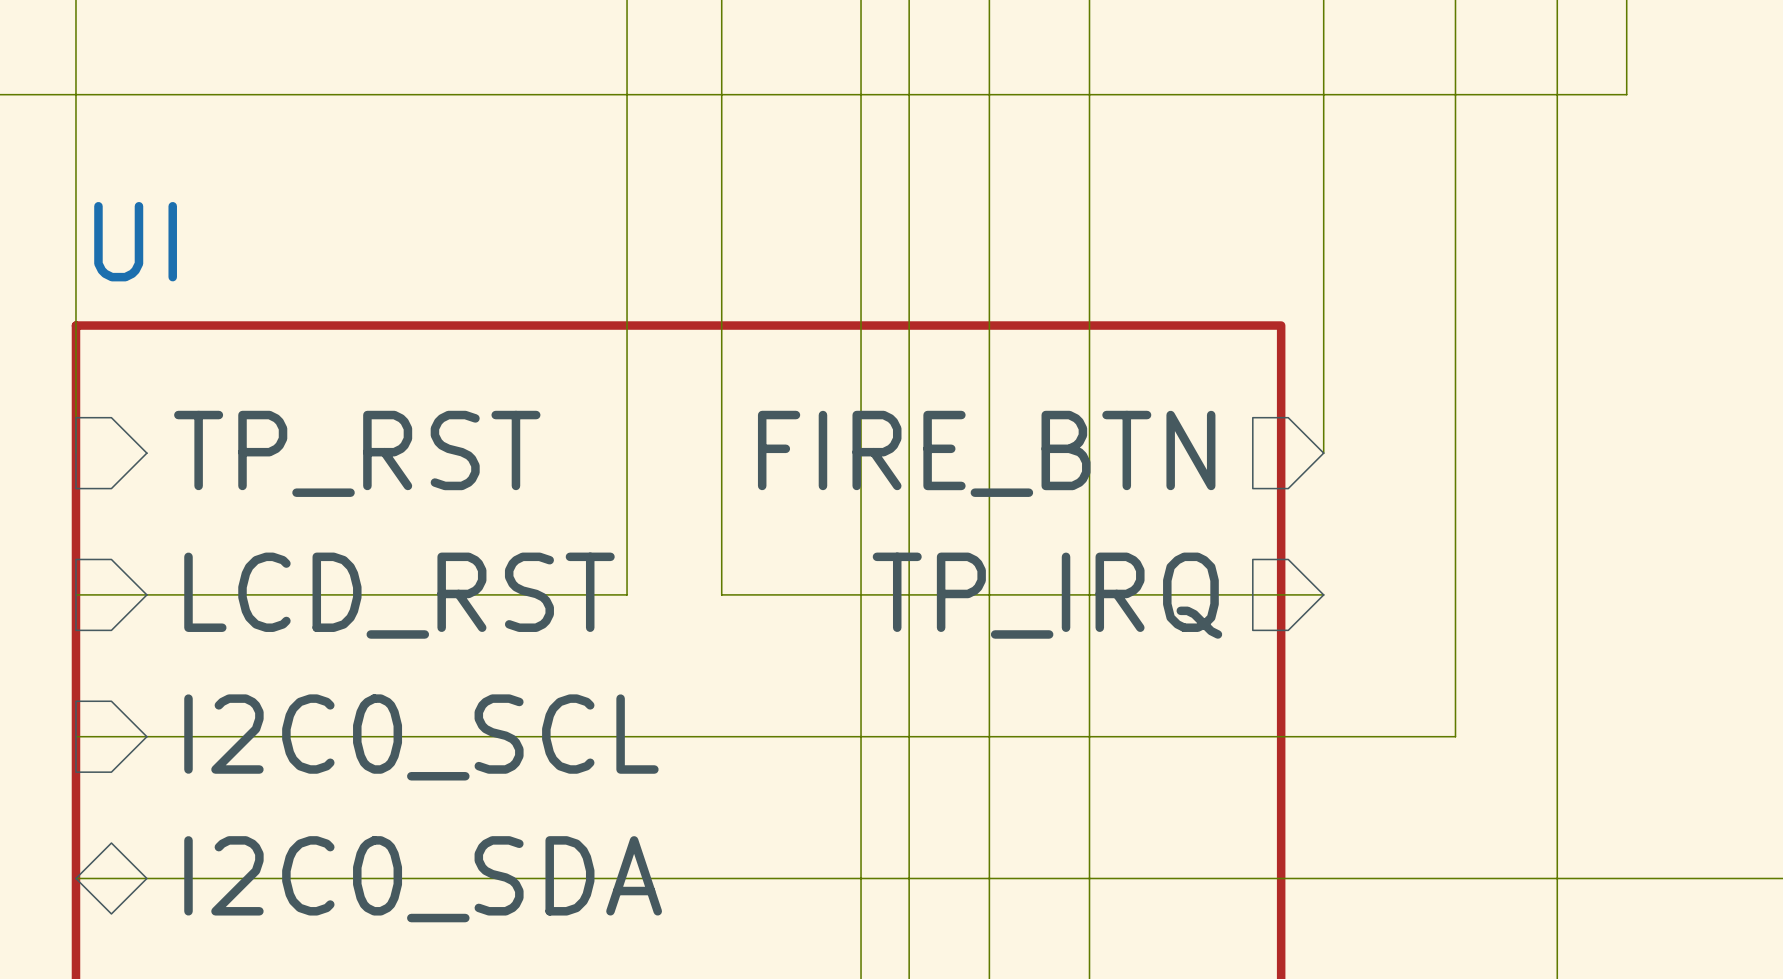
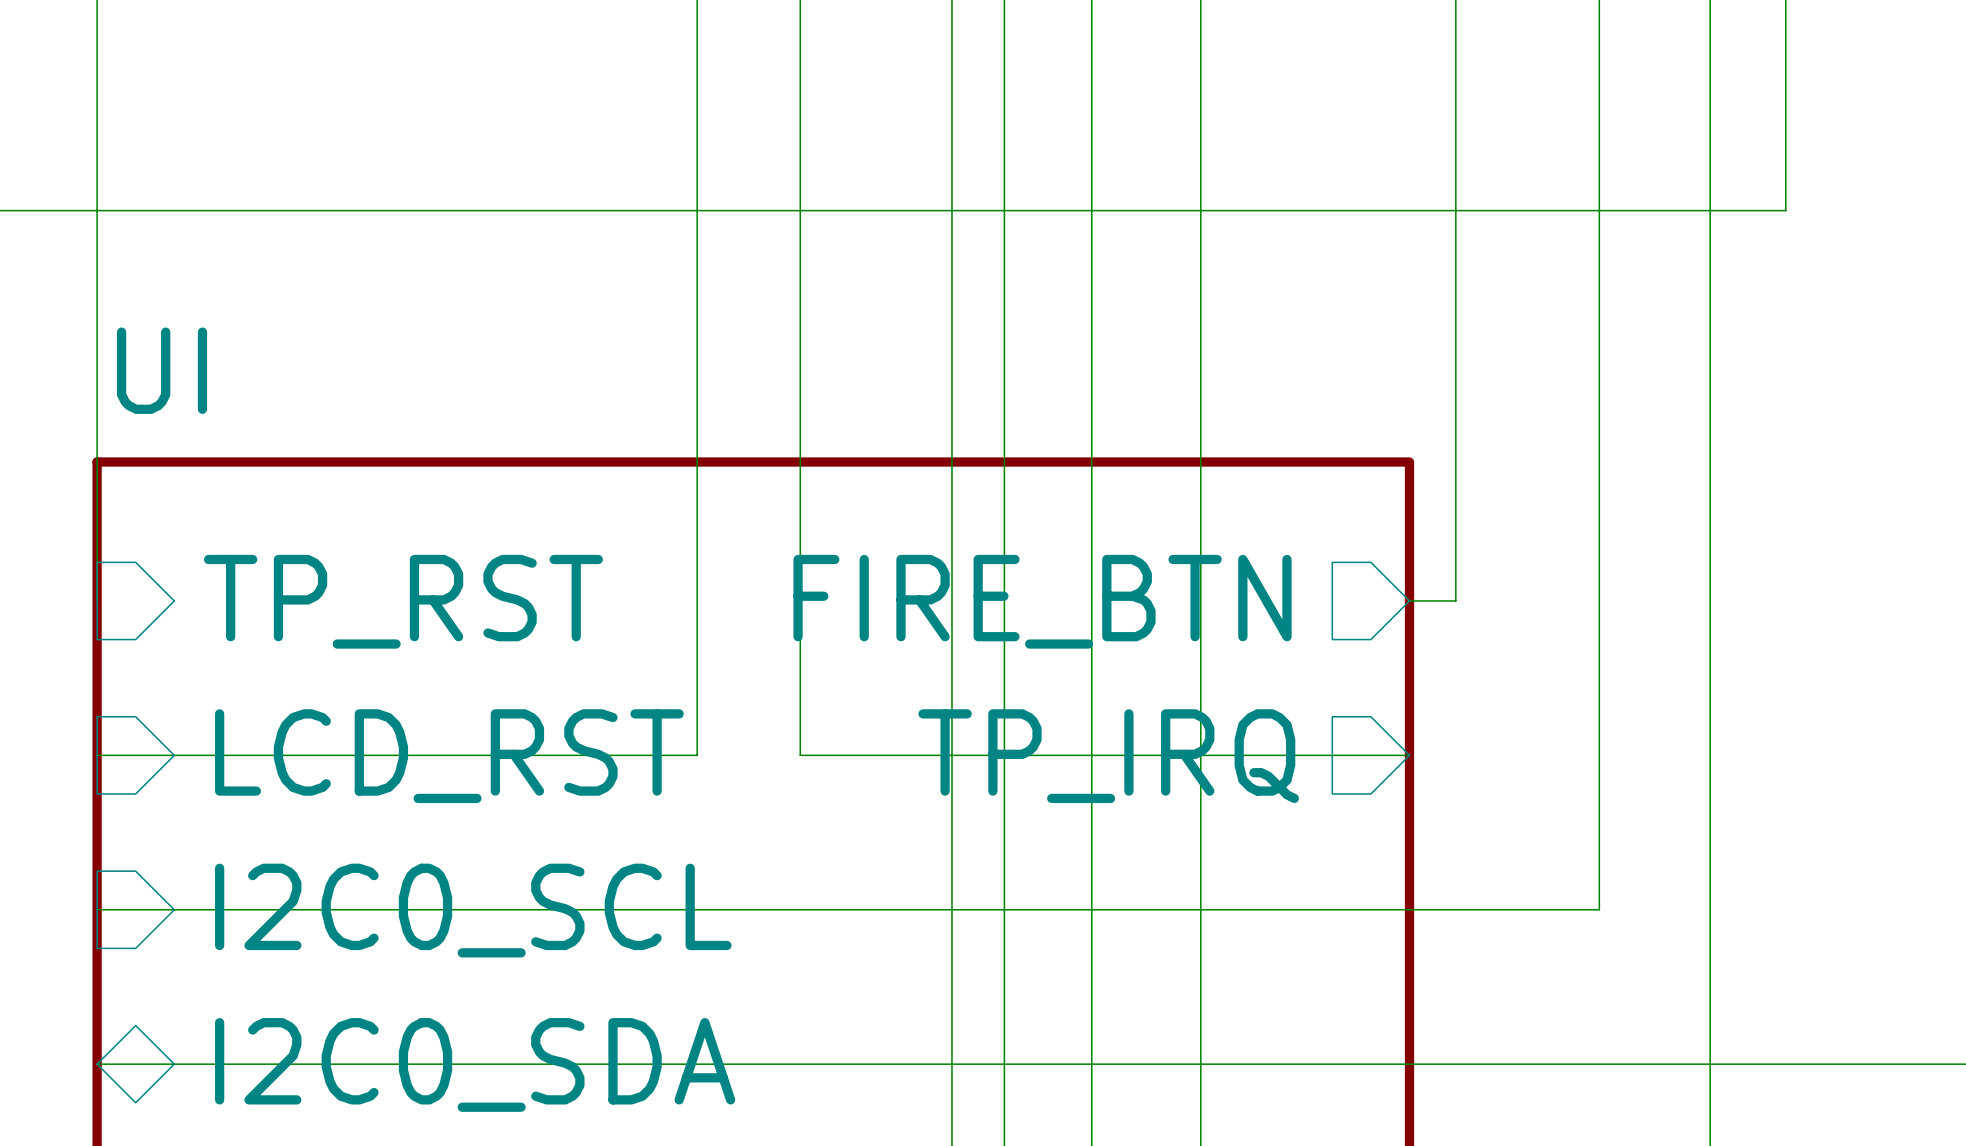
sheet pin position: FIRE_BTN (986, 453) -> FIRE_BTN (1042, 601)
wire: (1281, 594) (1323, 594) -> (1409, 600) (1455, 600)
sheet pin position: TP_IRQ (1047, 595) -> TP_IRQ (1108, 756)

